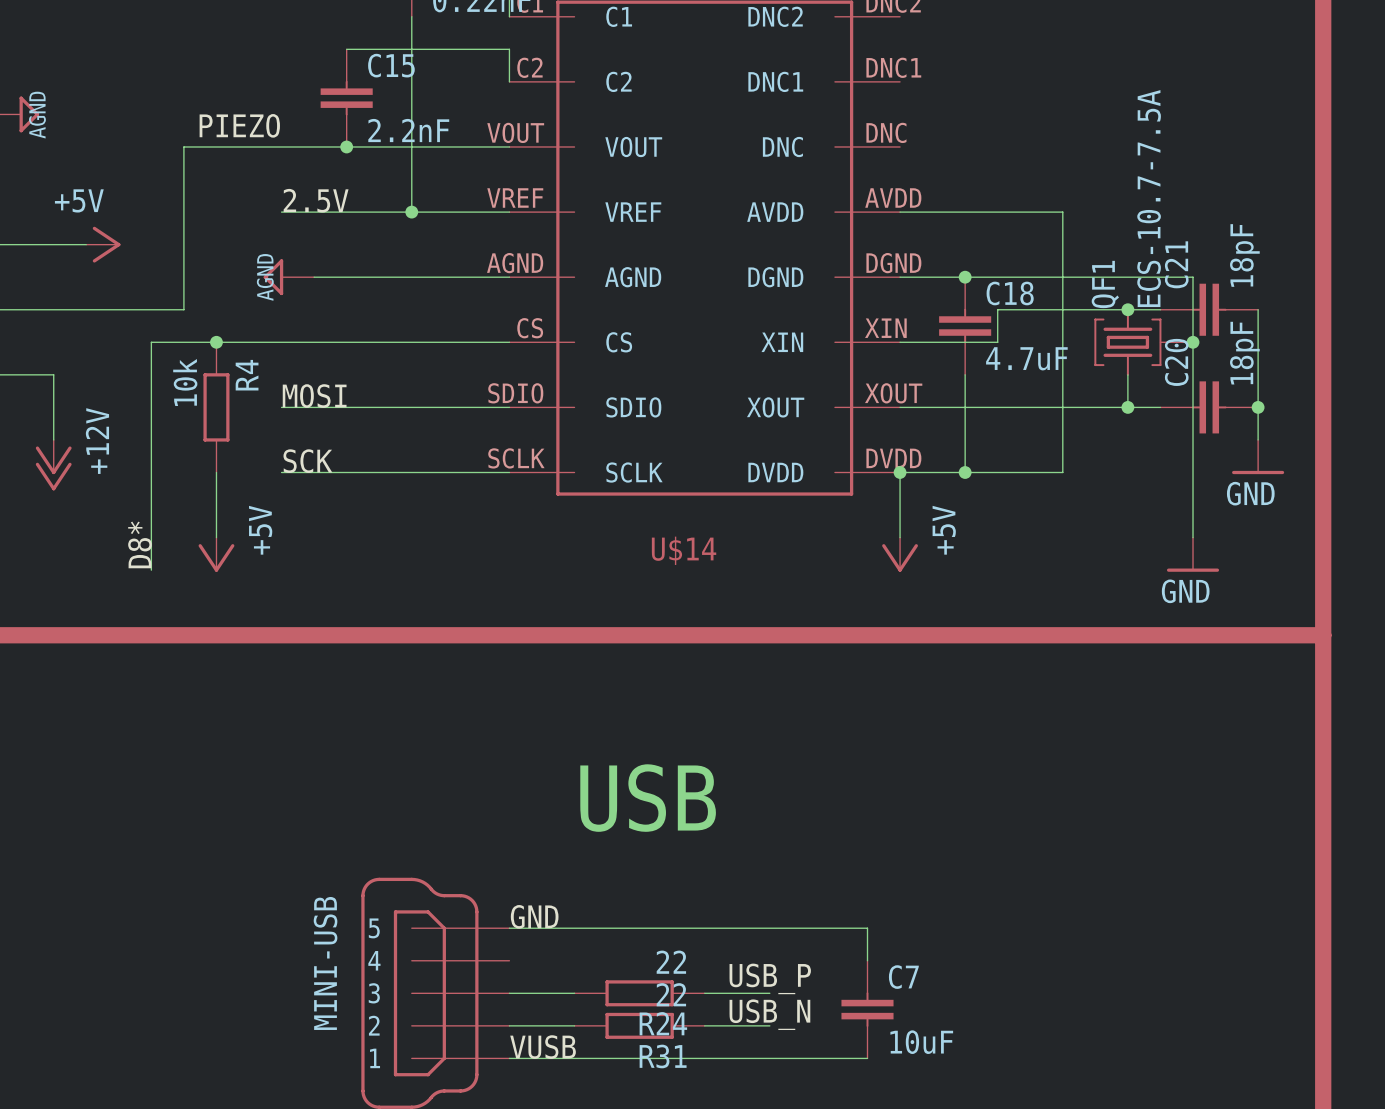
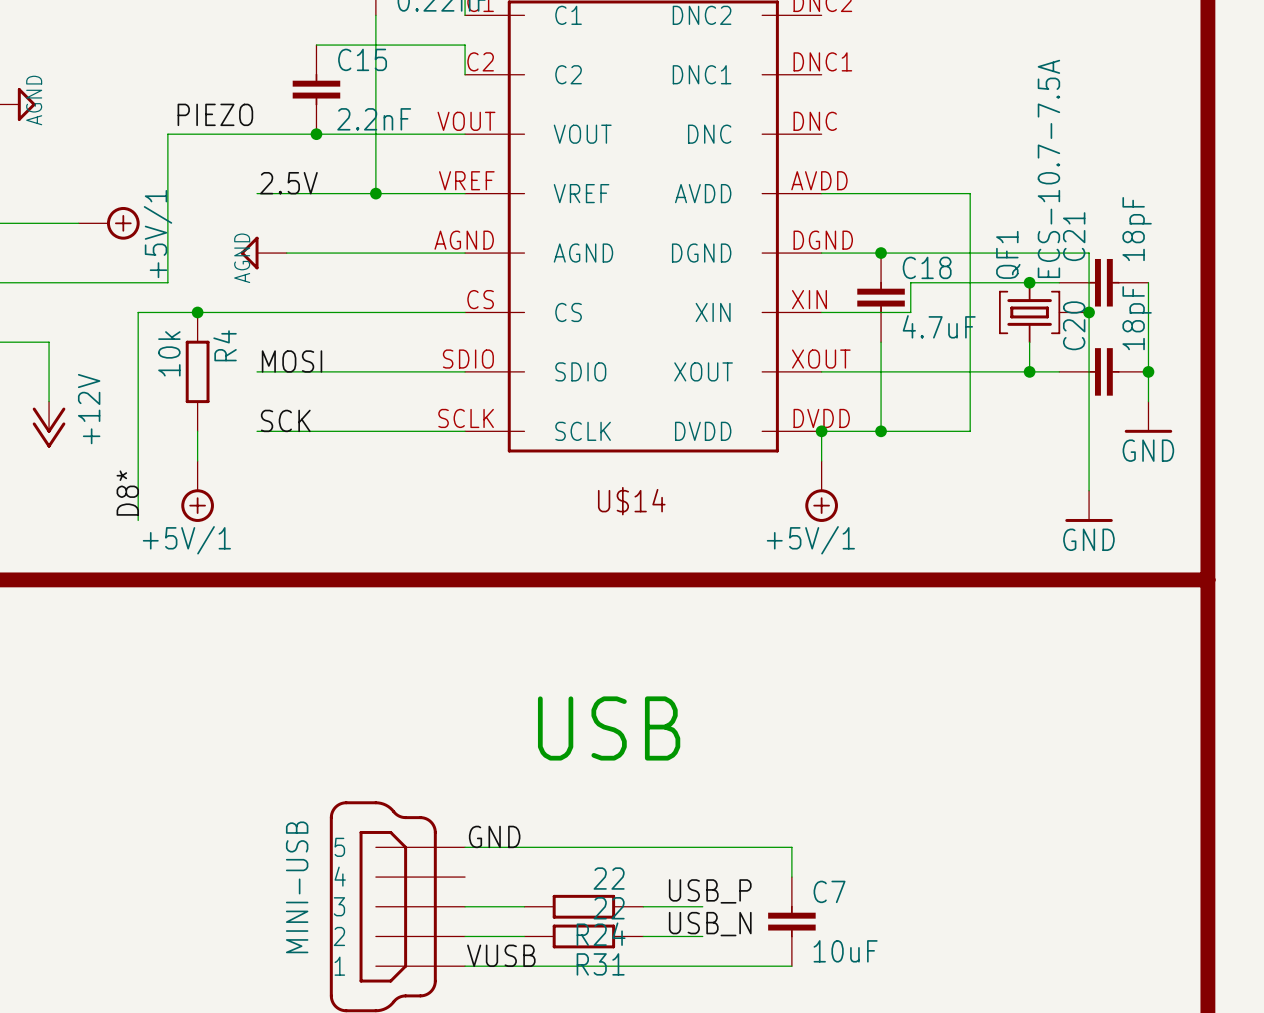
power symbol: +5V (103, 244) -> none
power symbol: none -> +5V/1 (109, 223)
power symbol: none -> +5V/1 (197, 491)
power symbol: none -> +5V/1 (821, 491)
power symbol: +5V (216, 554) -> none
power symbol: +5V (900, 554) -> none

